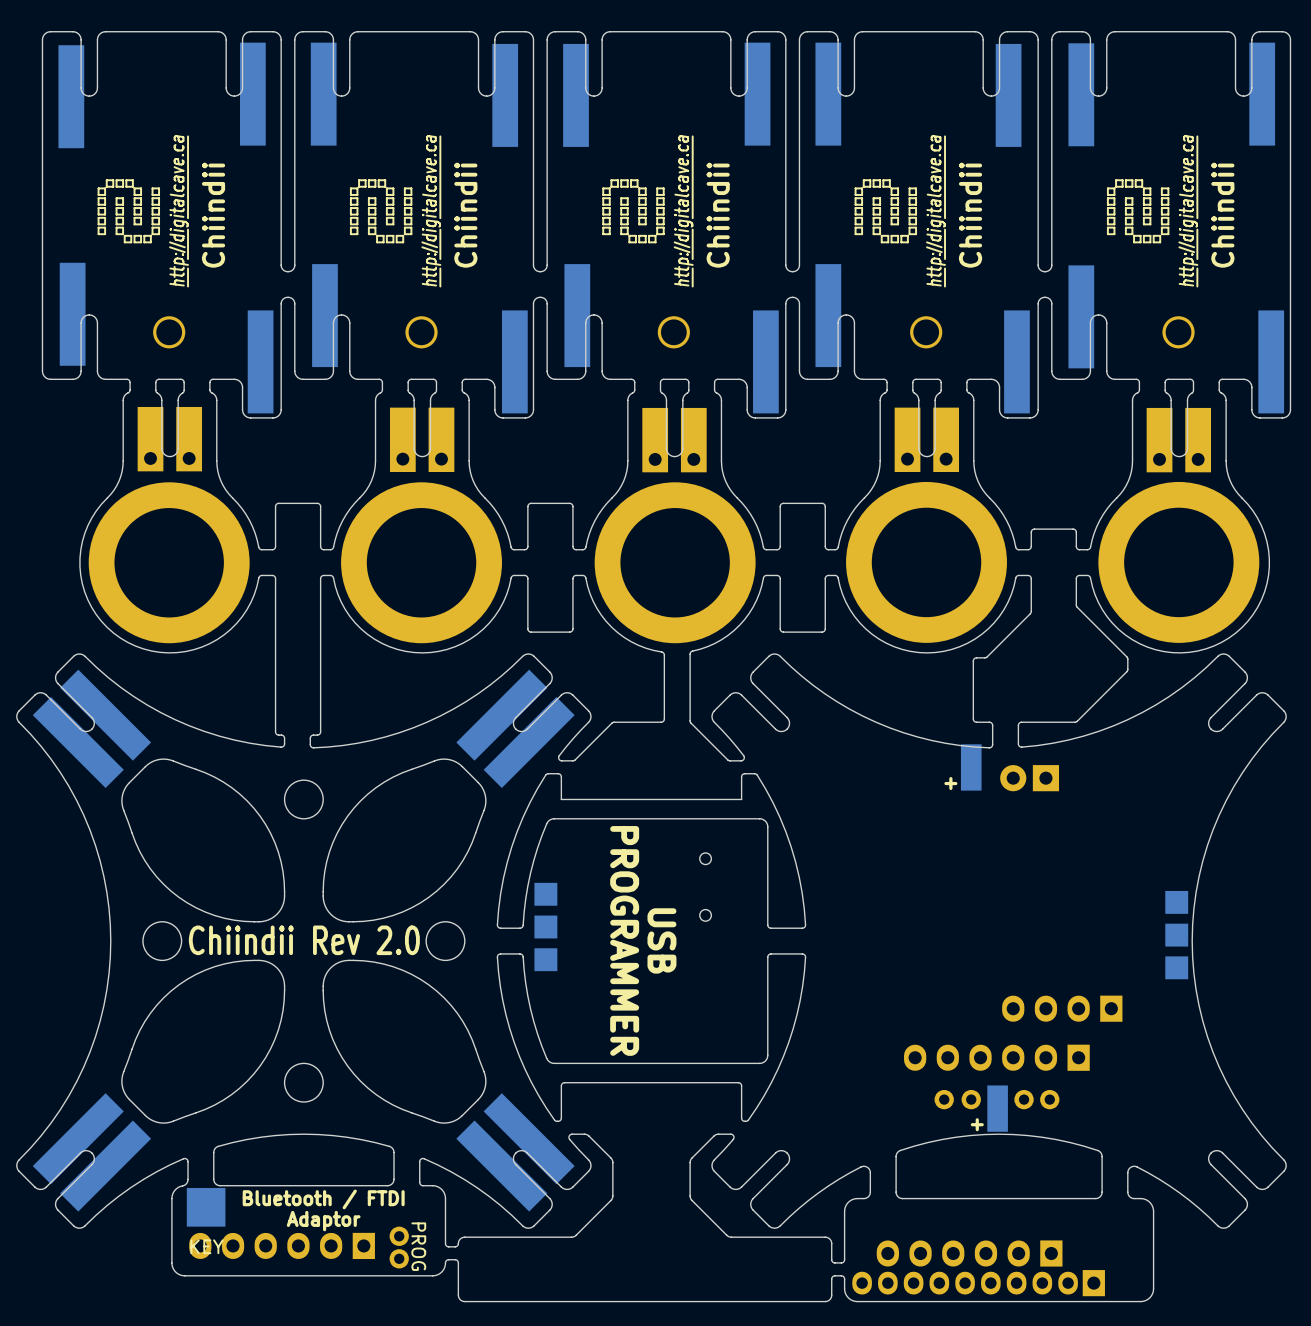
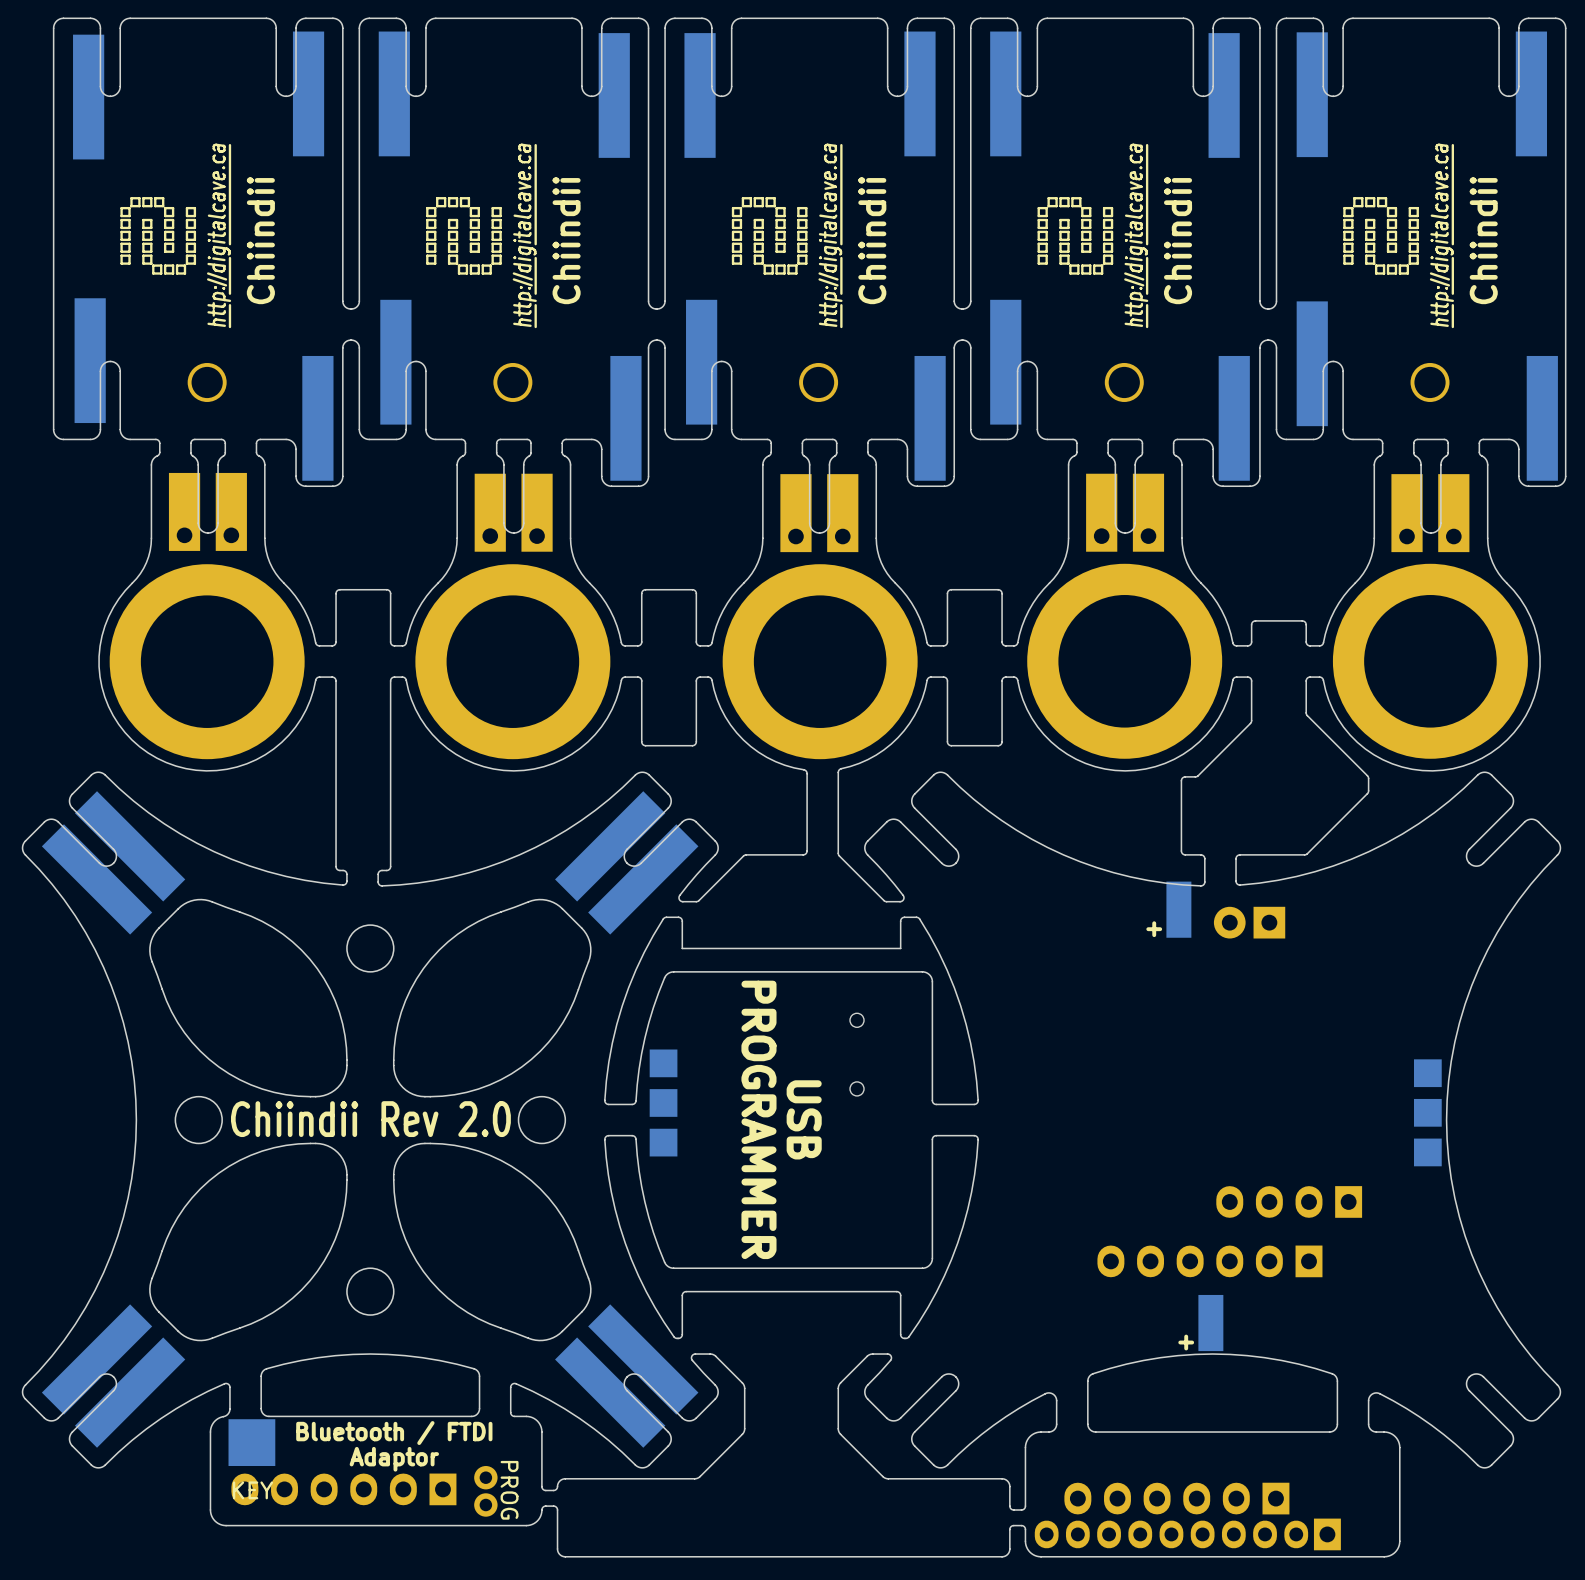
part: (944, 1099) -> none
part: (971, 1099) -> none
part: (1024, 1099) -> none
part: (1049, 1099) -> none

